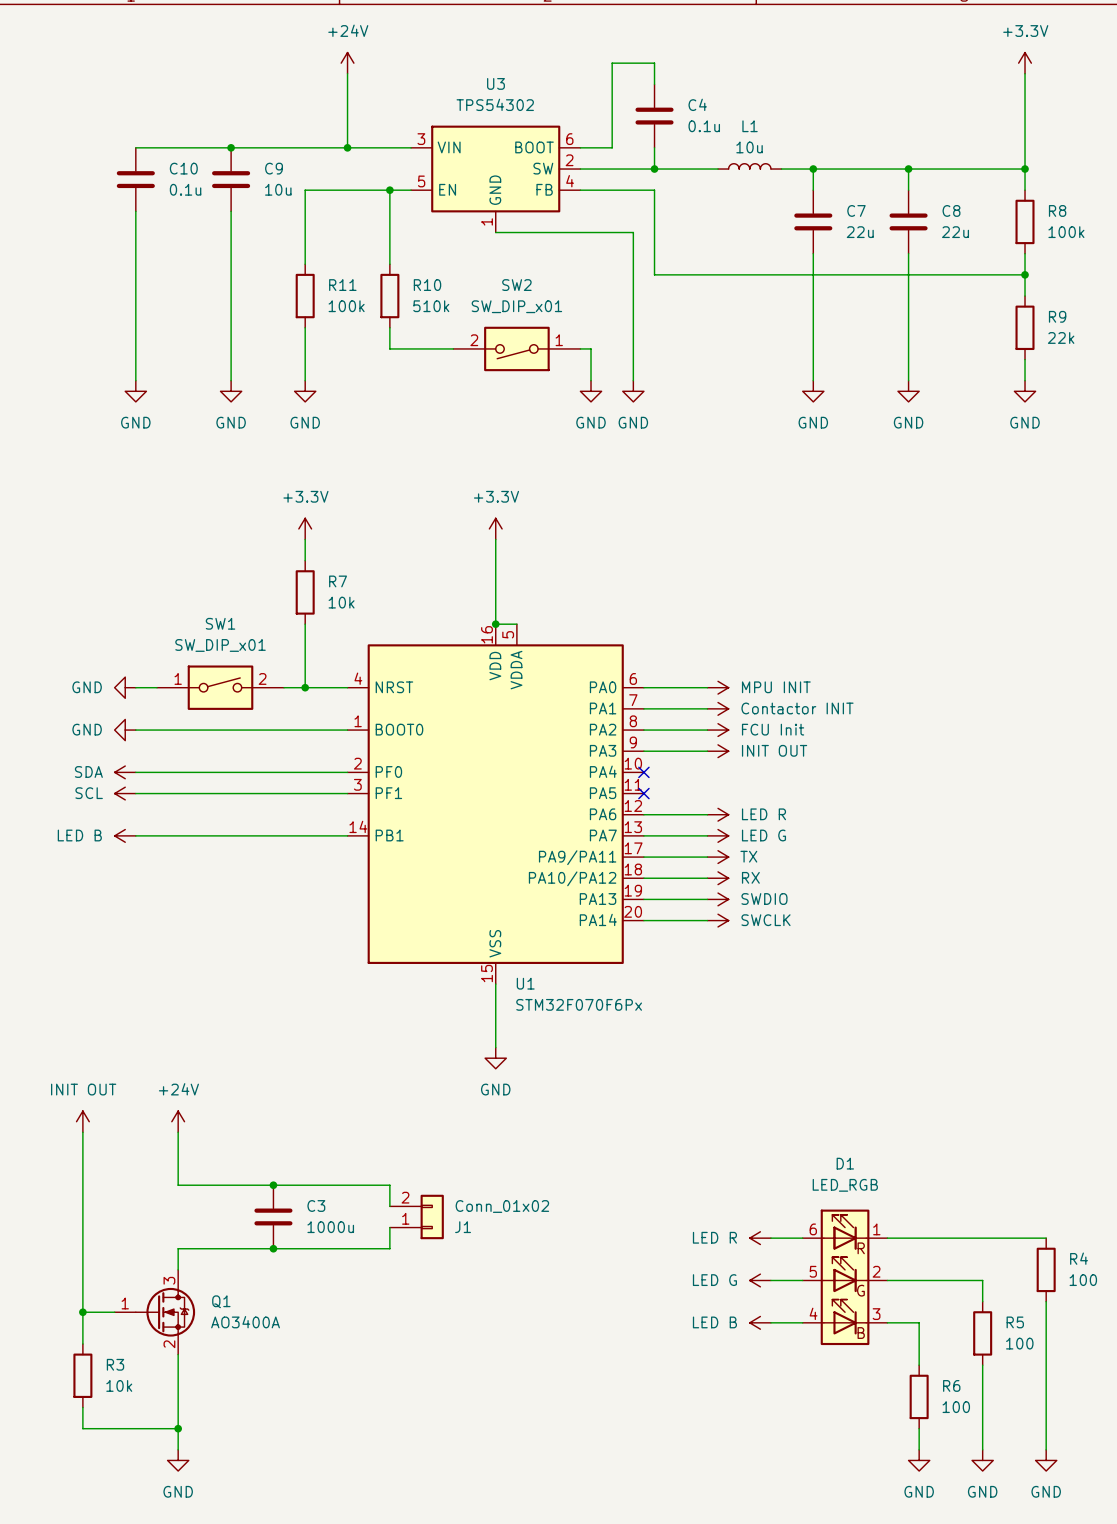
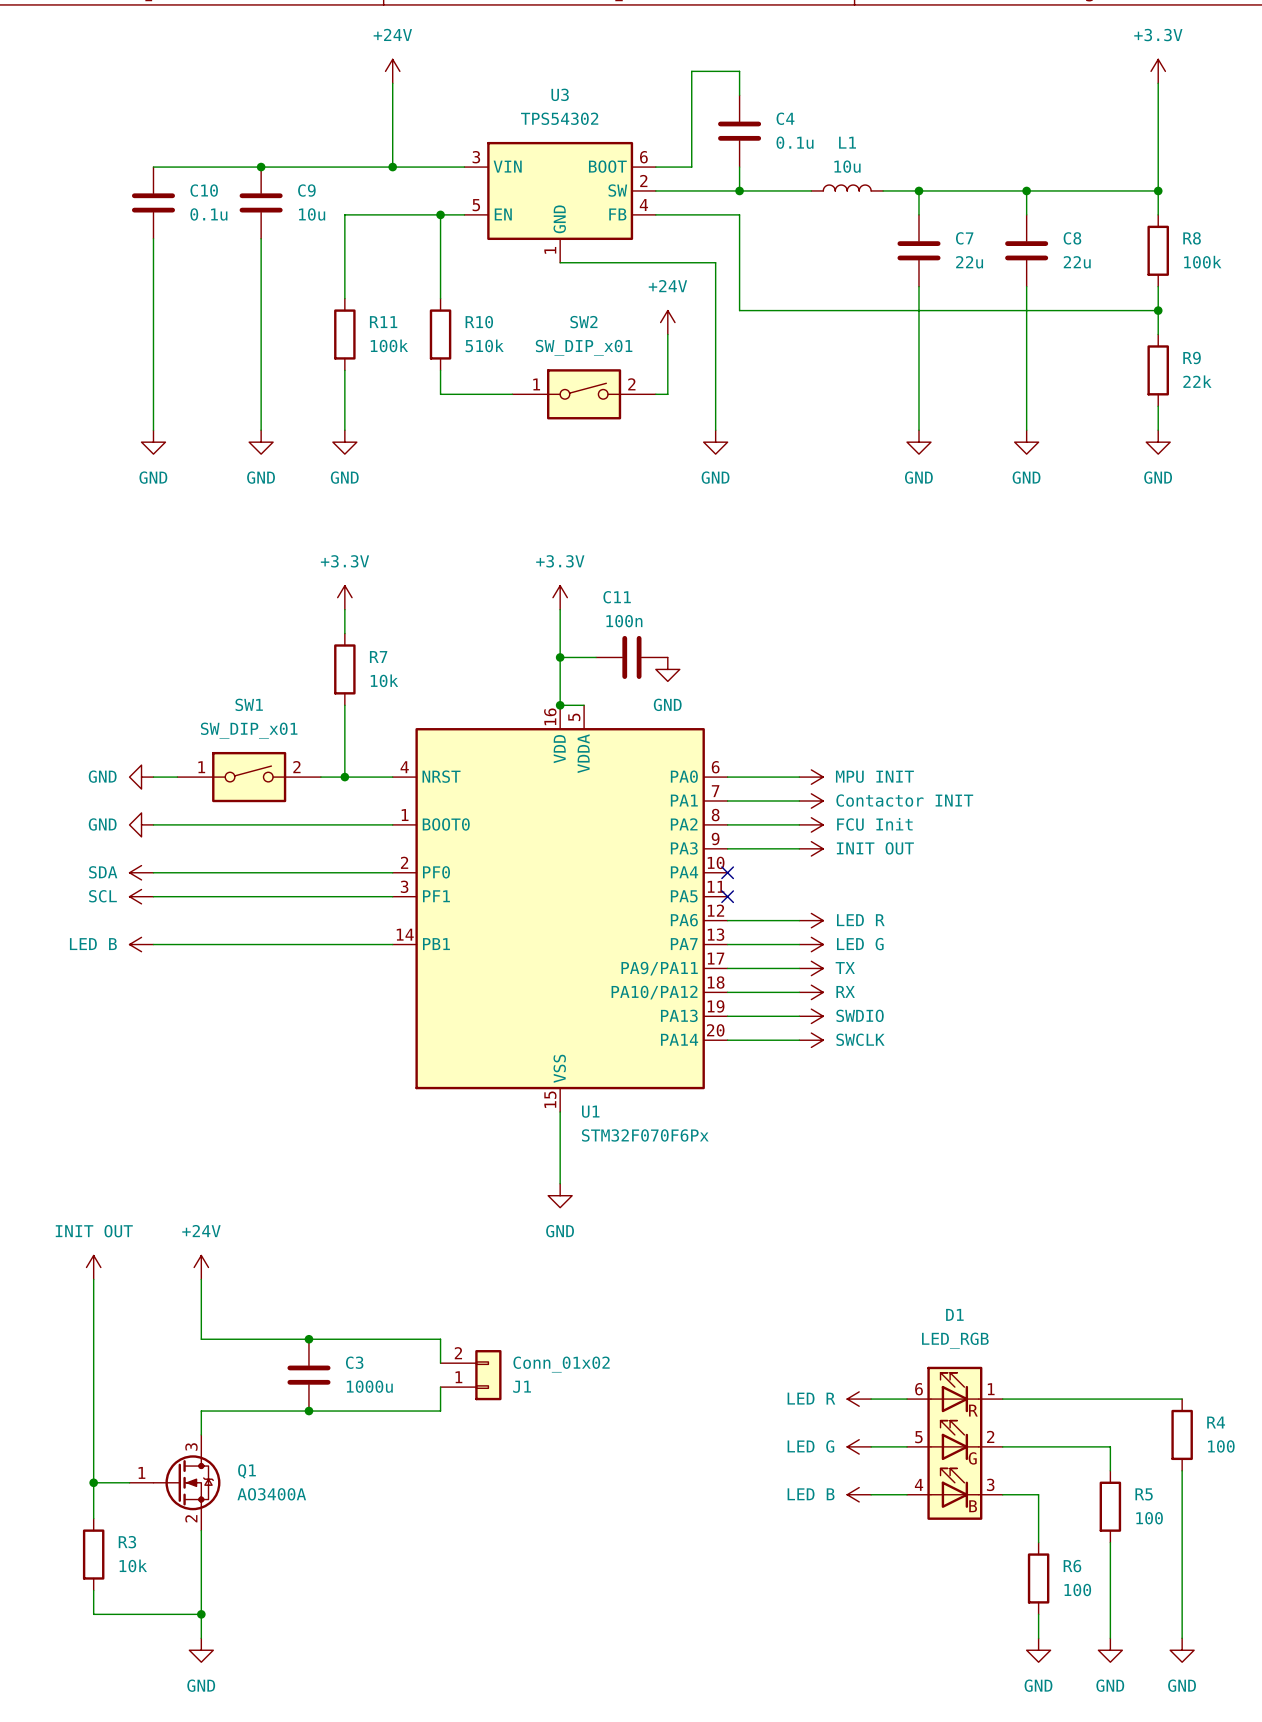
power symbol: none -> +24V (667, 322)
SW2 rotation: 0° (516, 348) -> 180° (584, 394)
wire: (591, 348) (591, 380) -> (667, 394) (667, 334)
power symbol position: GND (591, 391) -> GND (667, 669)
wire: none -> (560, 657) (596, 657)
junction: none -> (560, 657)
C11: none -> 100n (631, 657)

